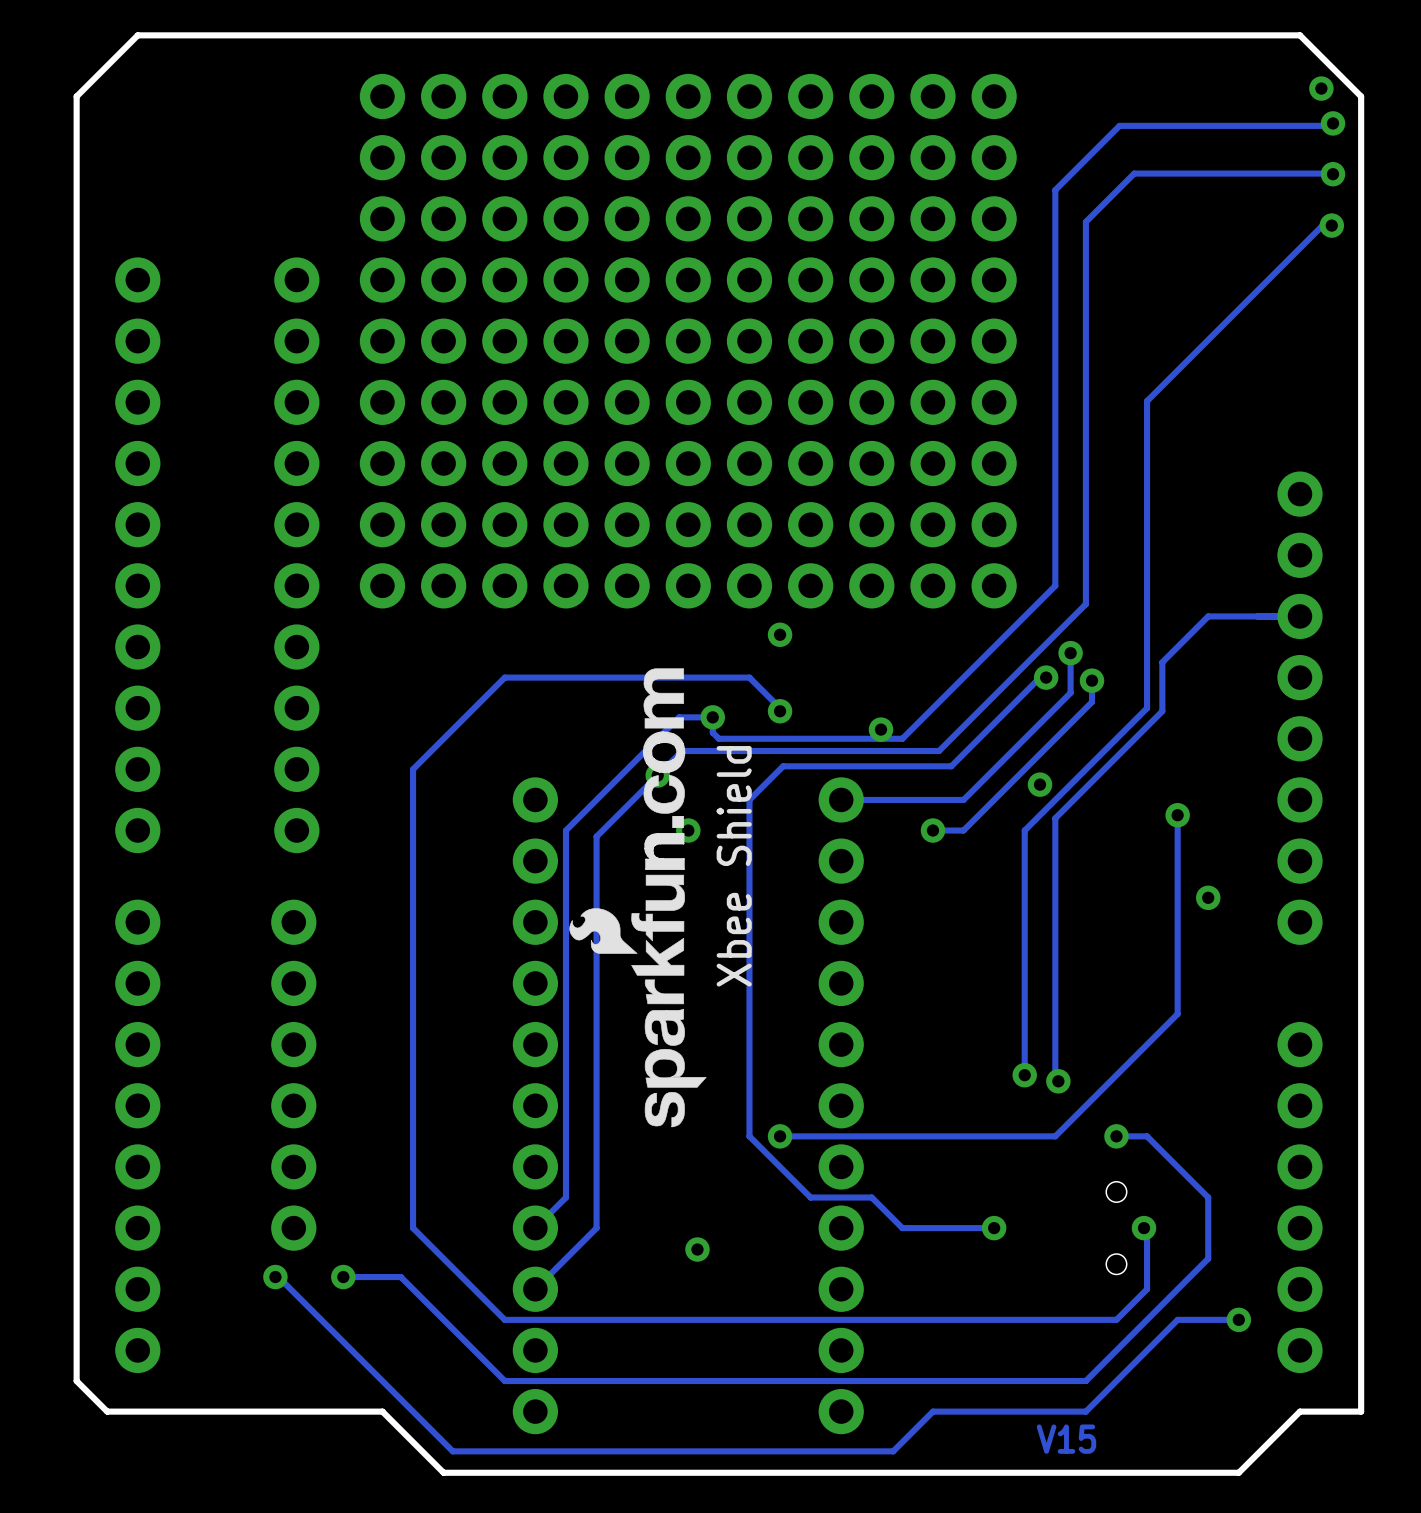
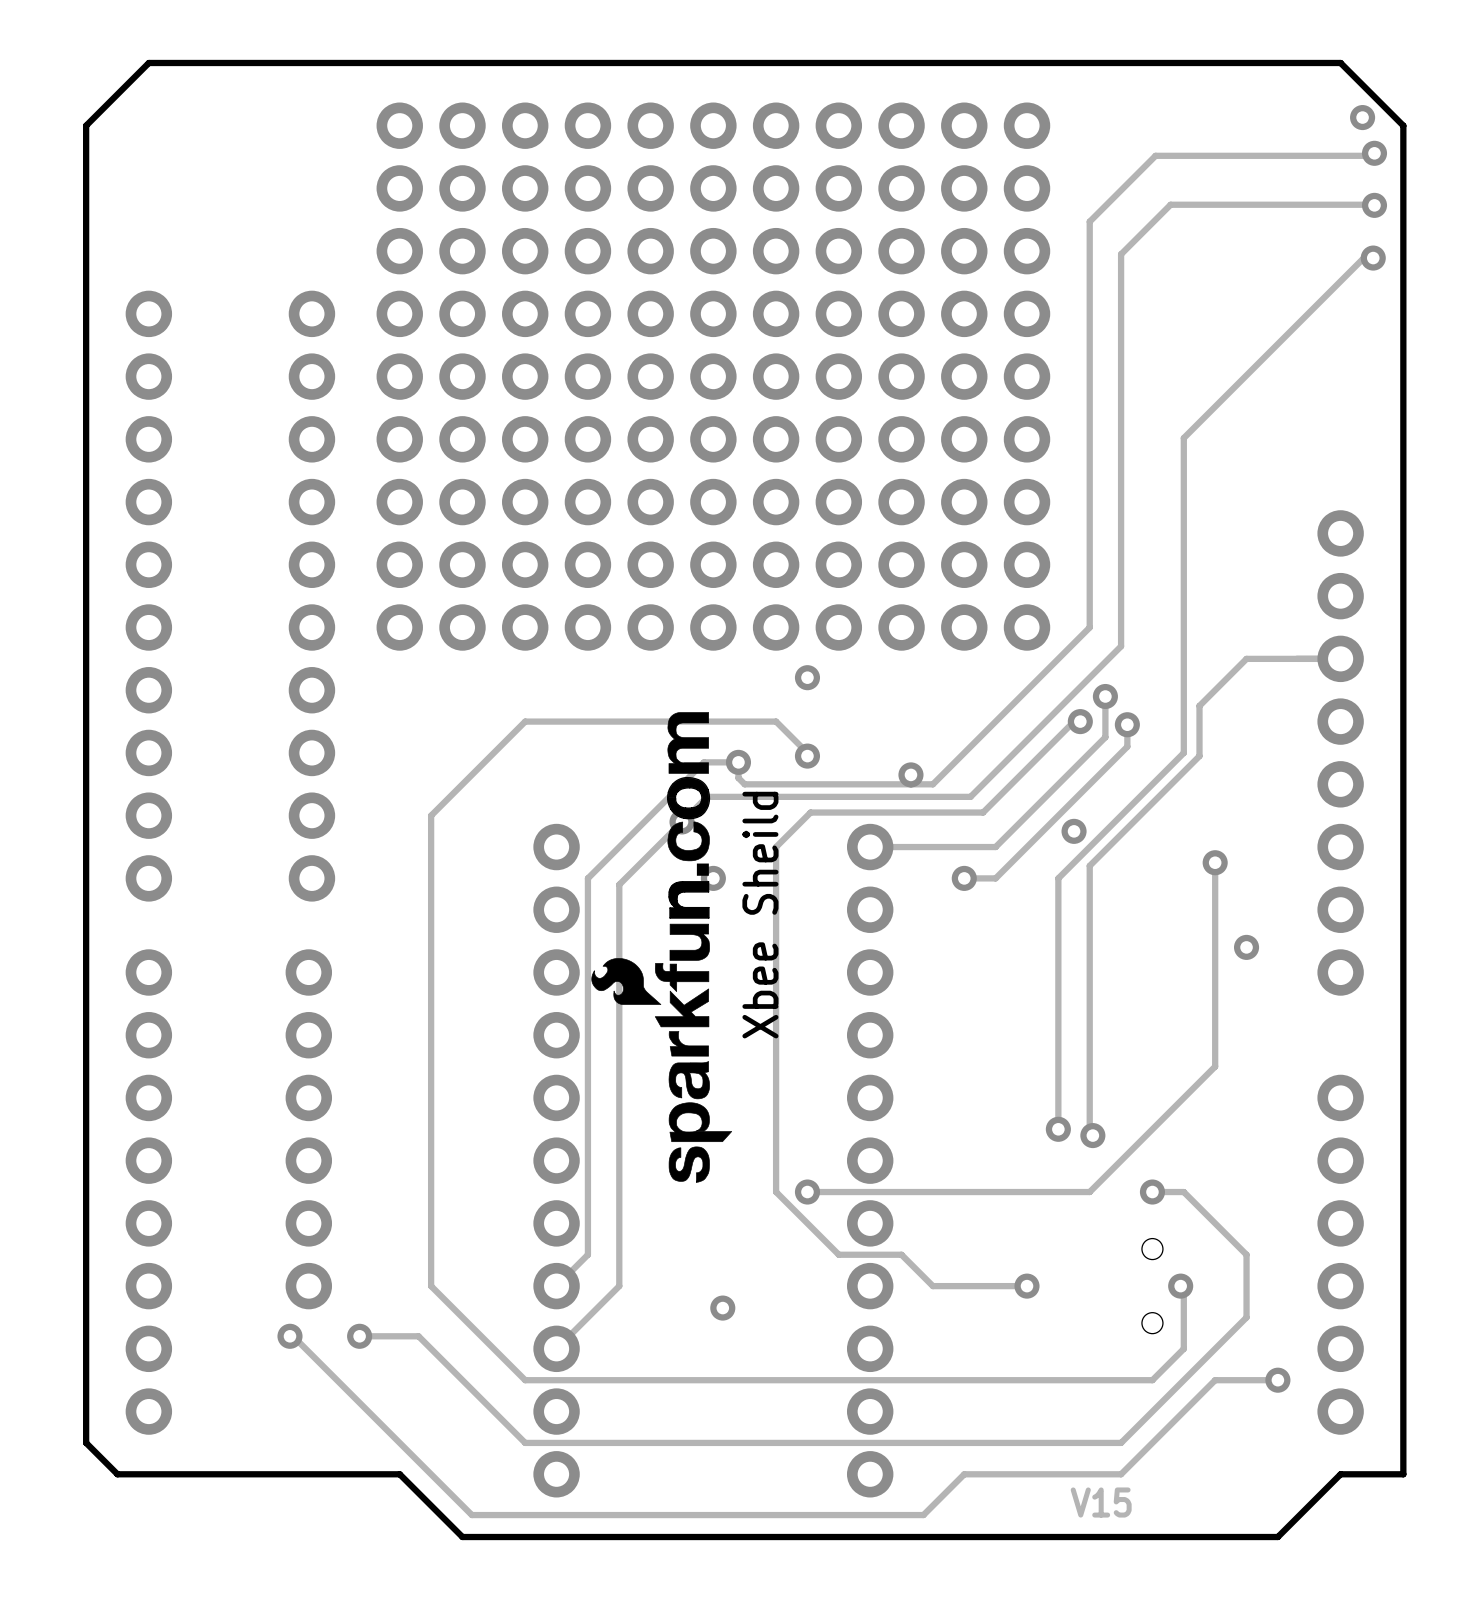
text: Xbee Shield (734, 866) -> Xbee Sheild (760, 915)

